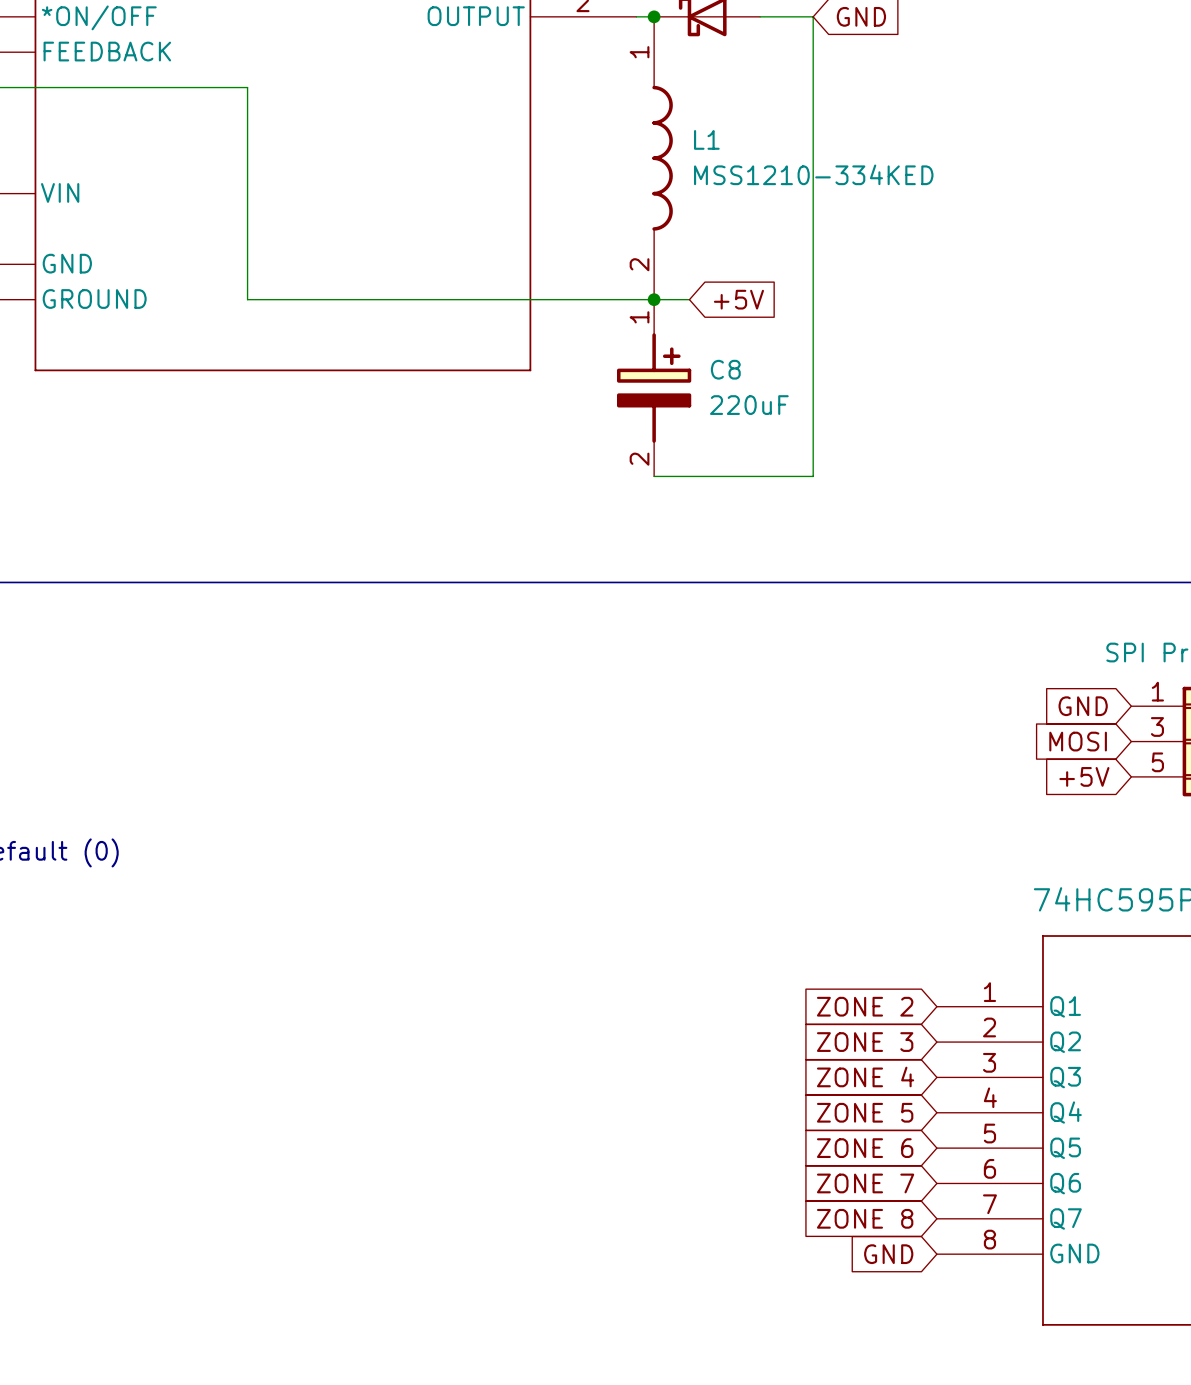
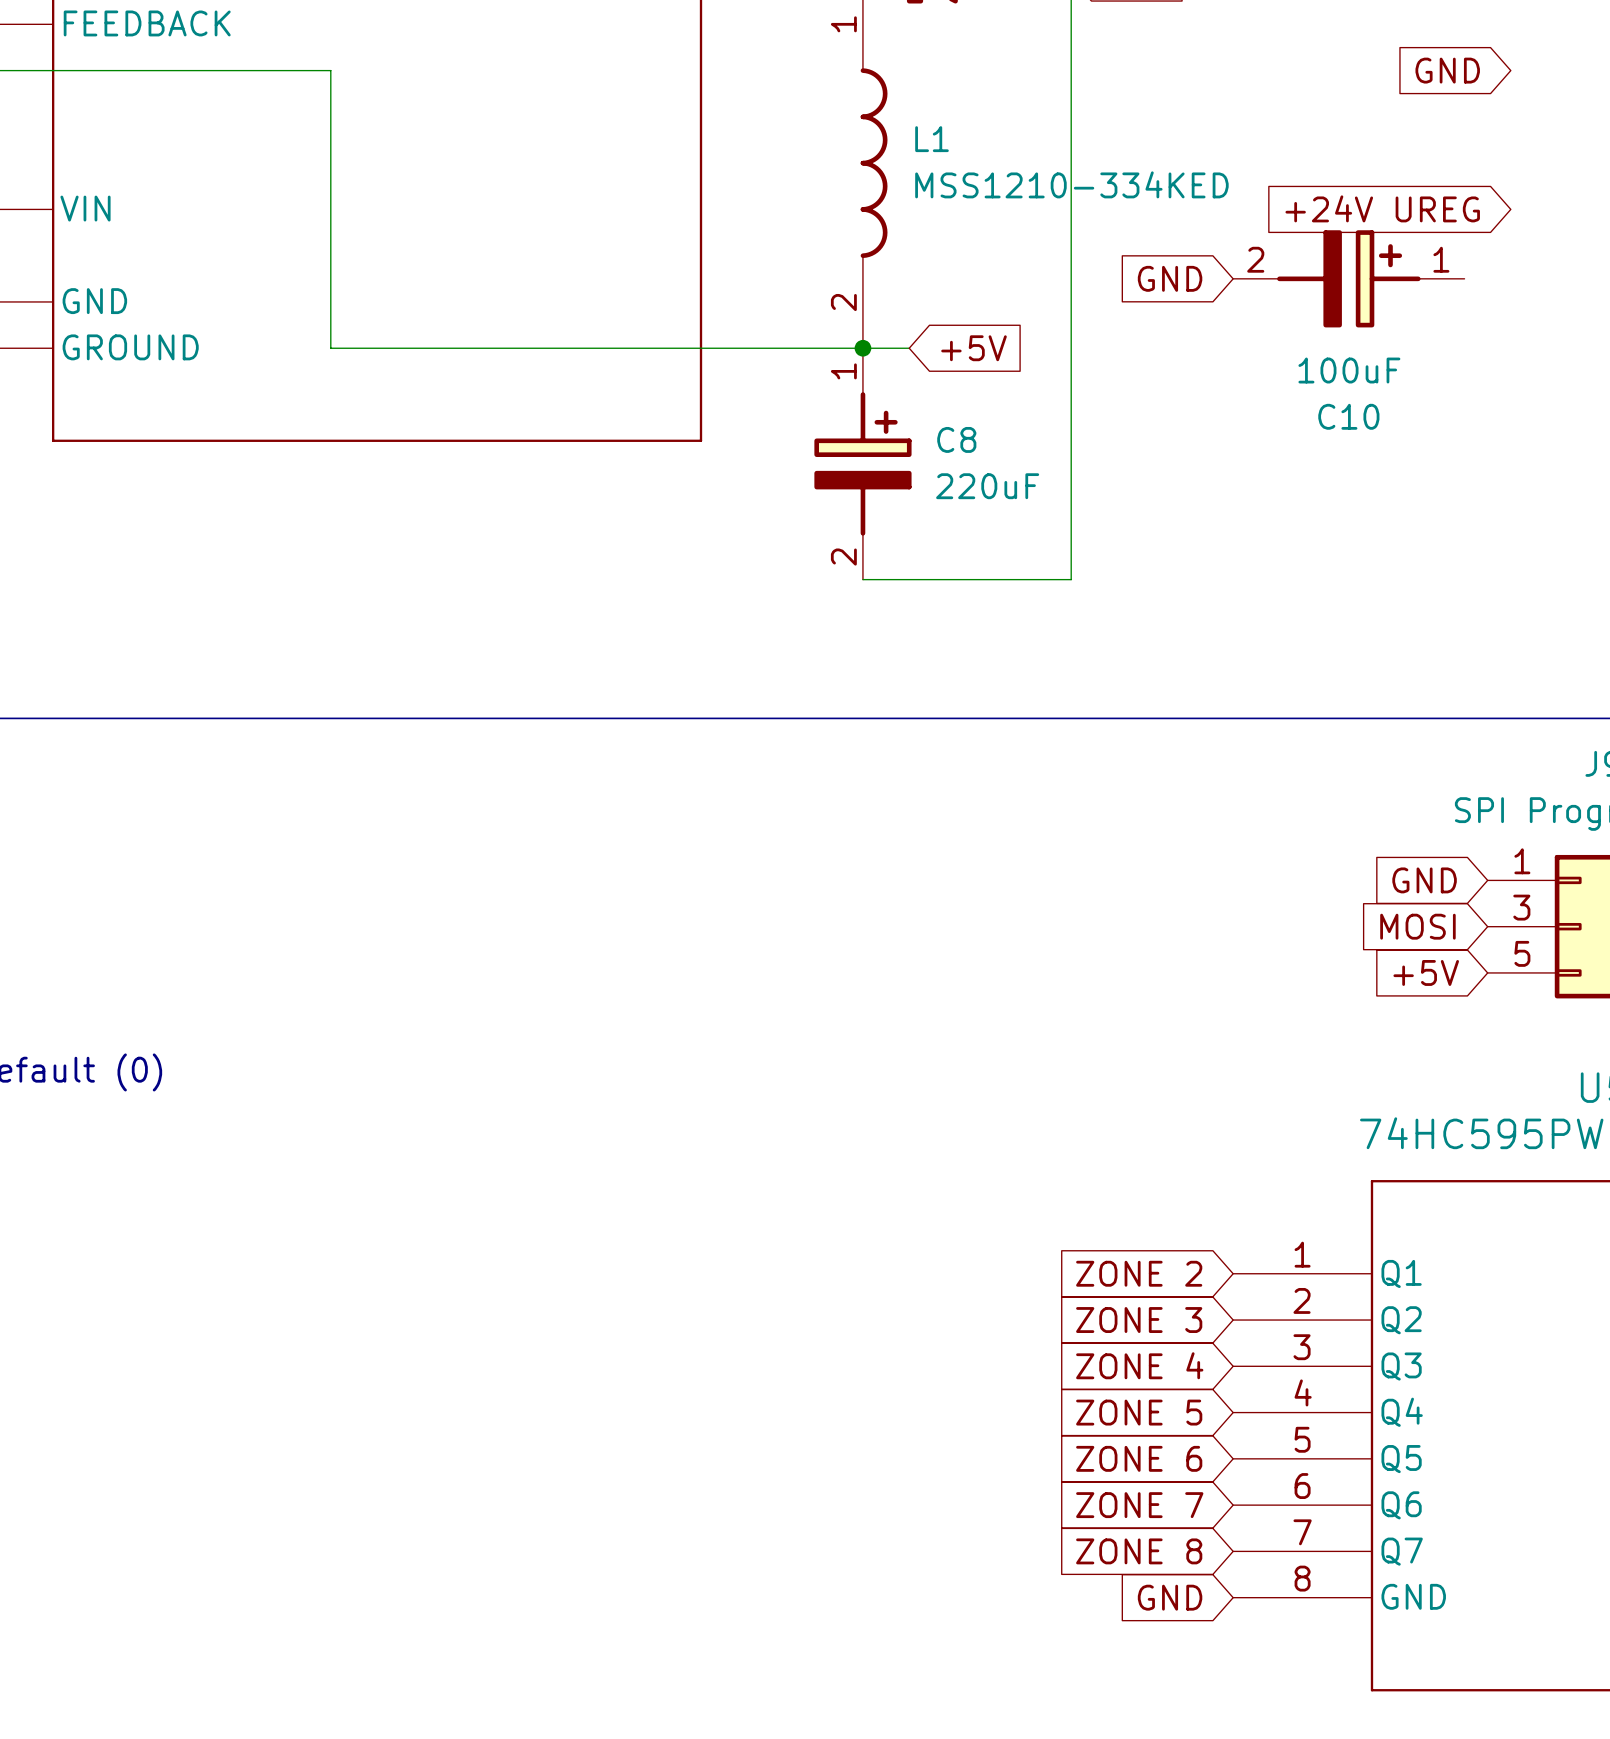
global label: none -> GND (1447, 70)
global label: none -> +24V UREG (1382, 208)
global label: none -> GND (1170, 278)
C10: none -> 100uF (1348, 278)

